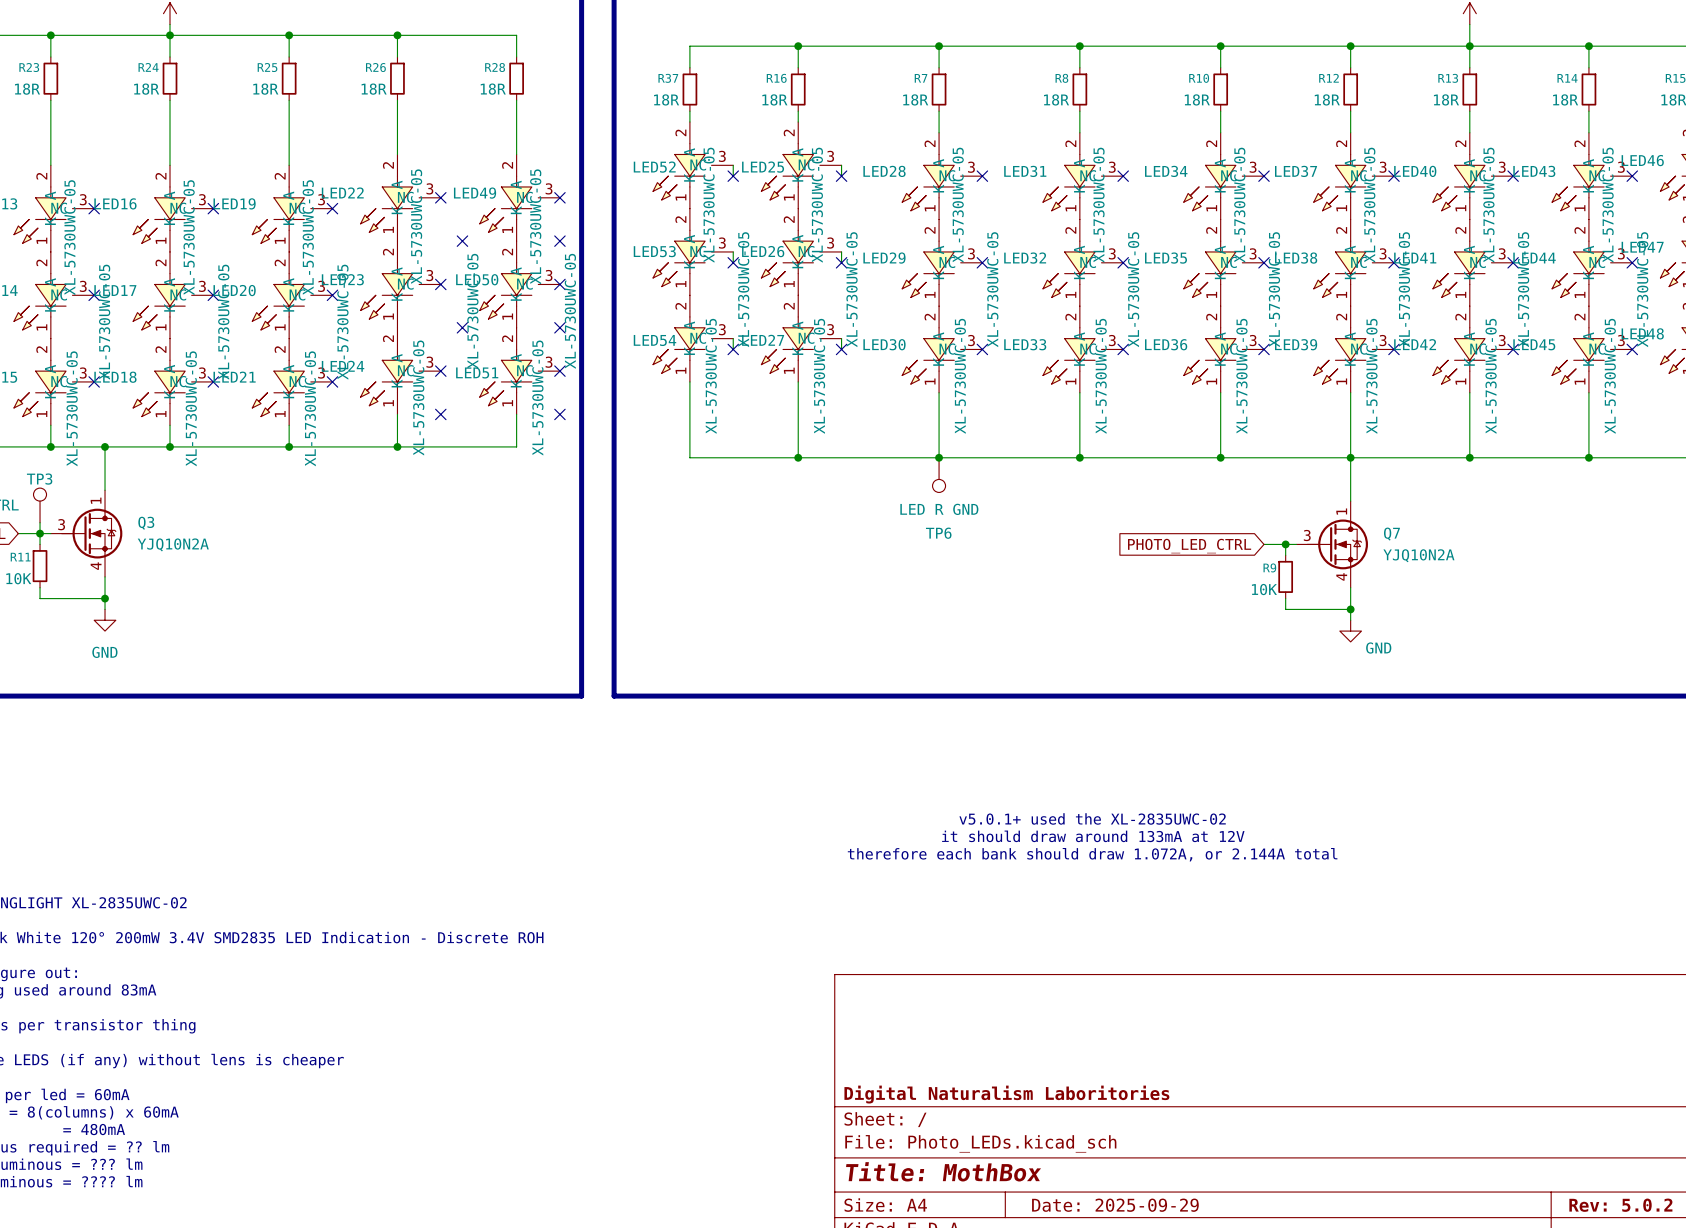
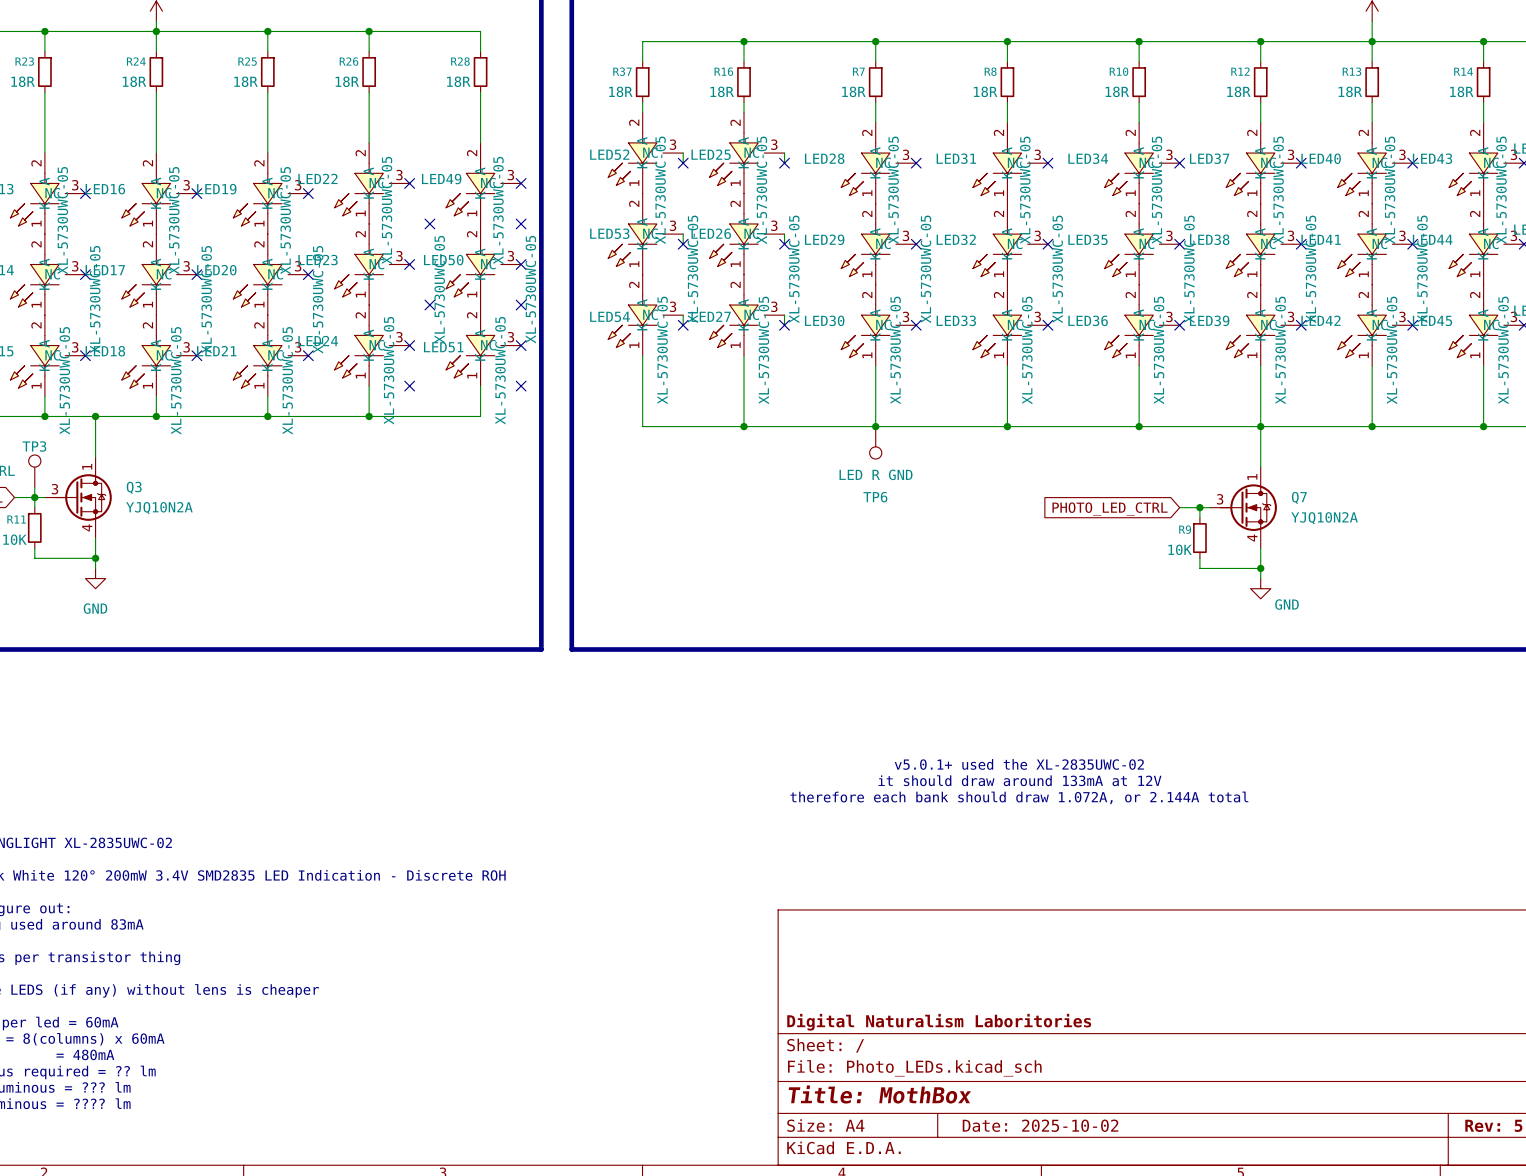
title block: Date: 2025-09-29 (1115, 1205) -> Date: 2025-10-02 (1040, 1125)

